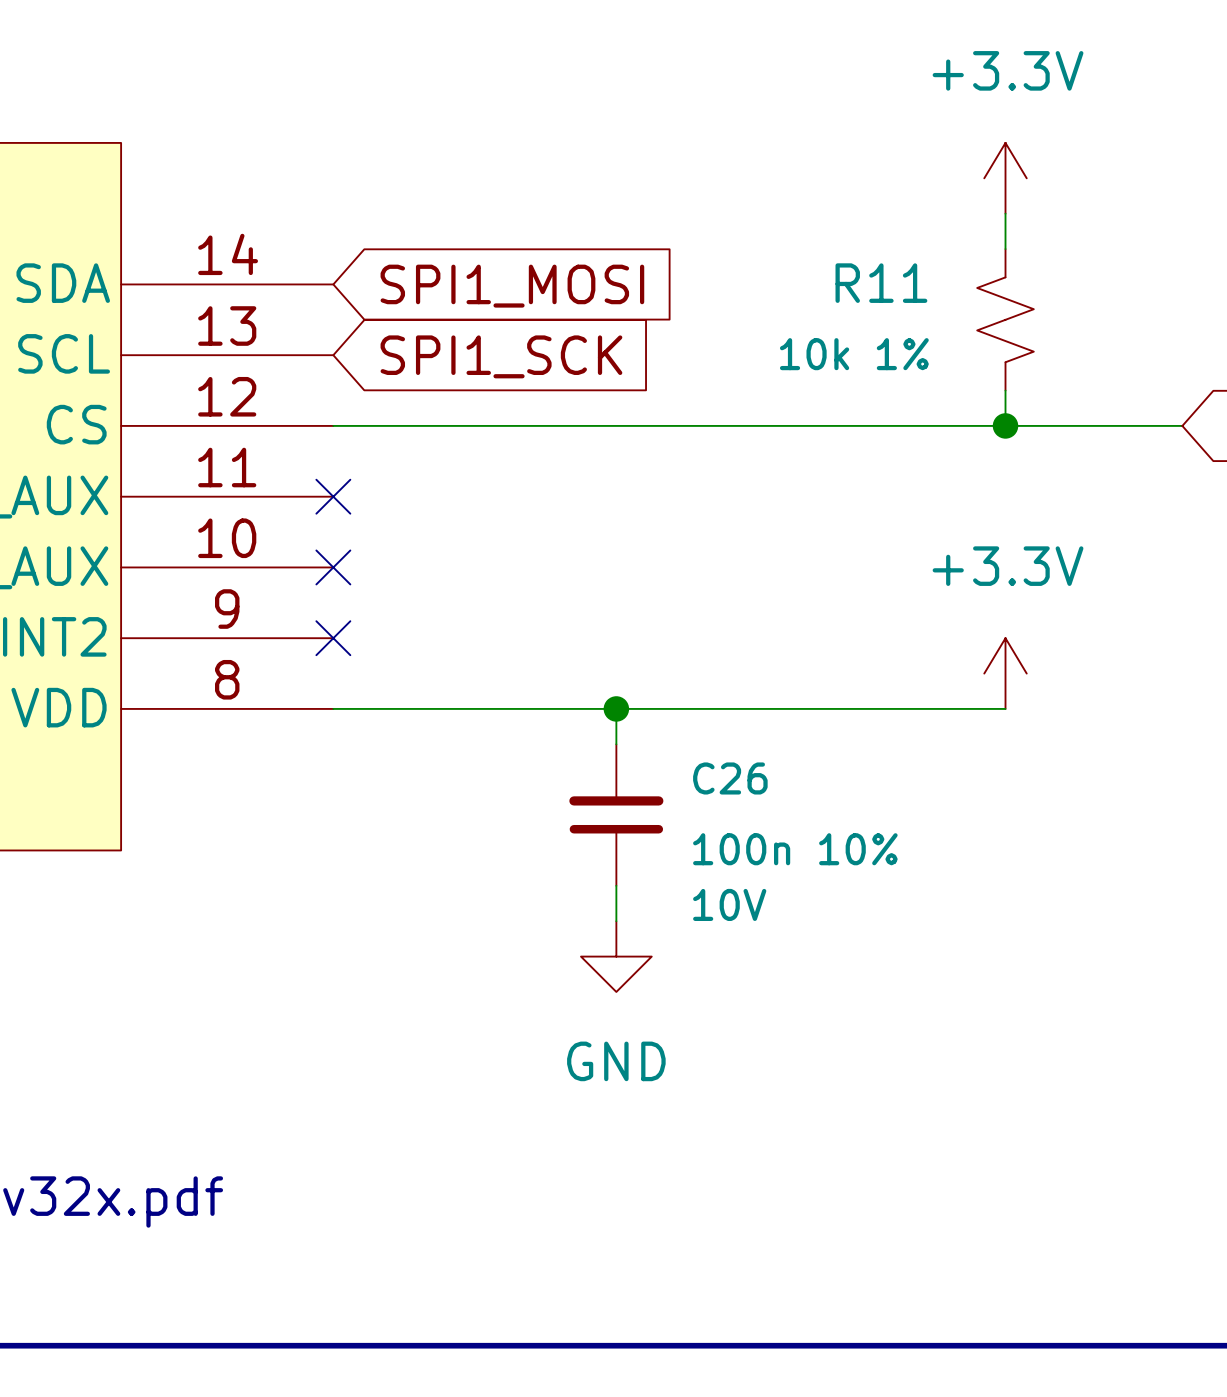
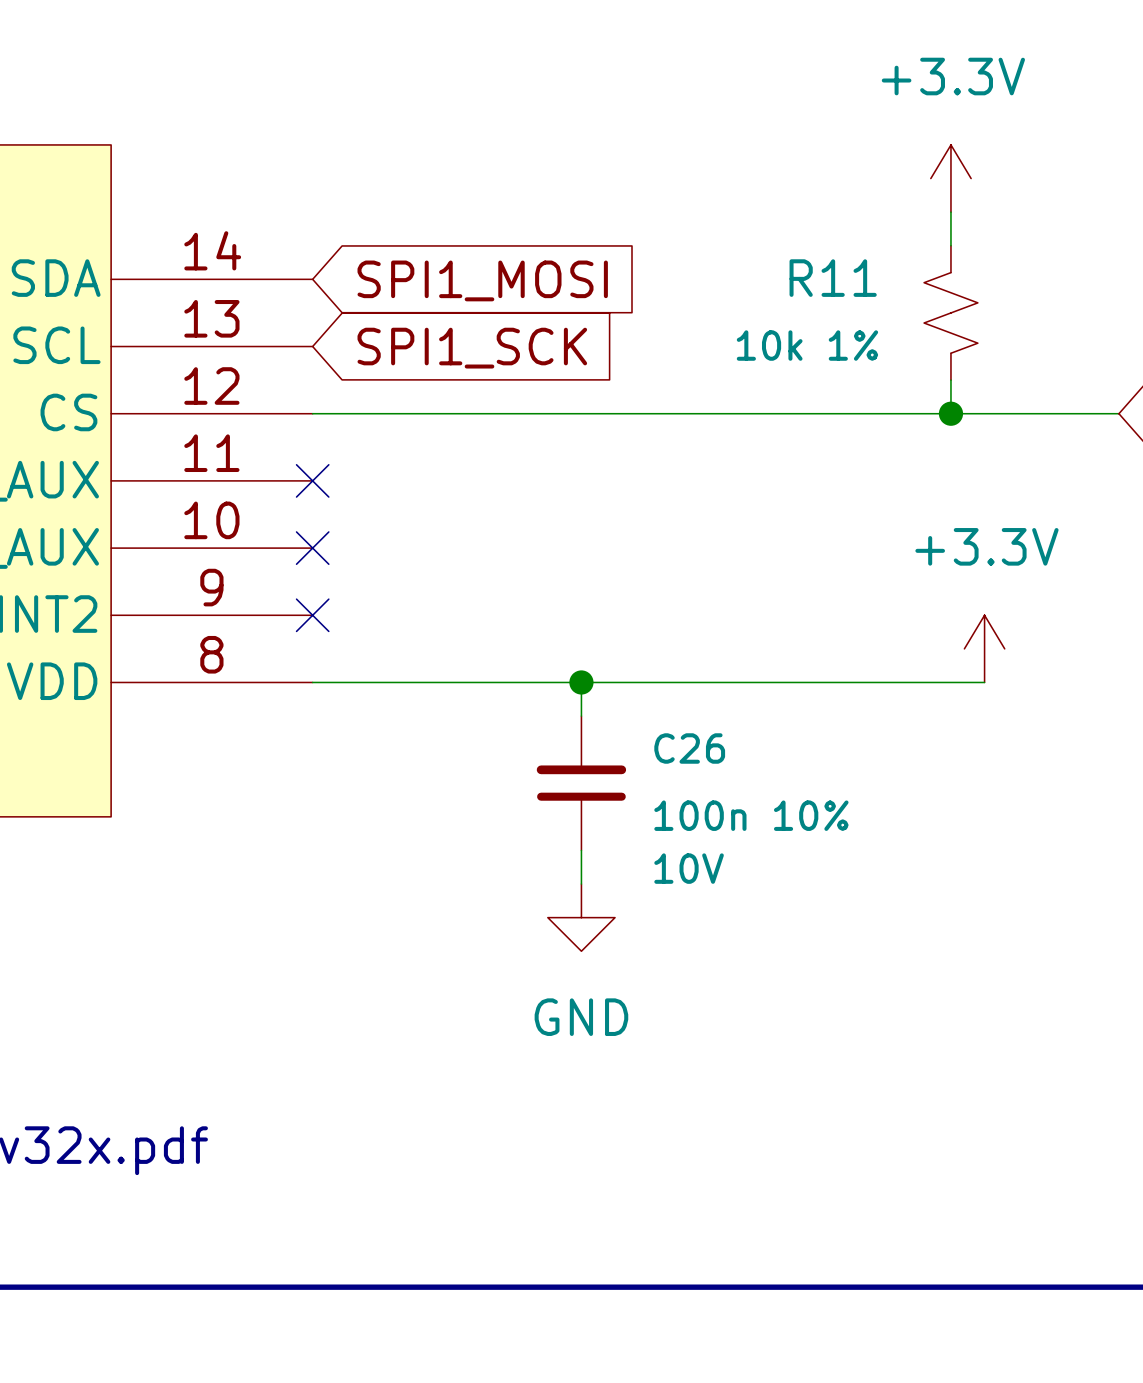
power symbol position: +3.3V (1005, 673) -> +3.3V (984, 648)
wire: none -> (950, 682) (984, 682)

